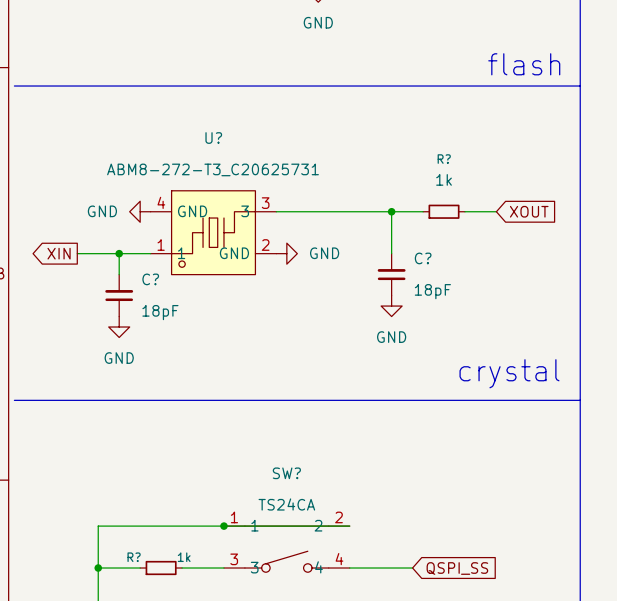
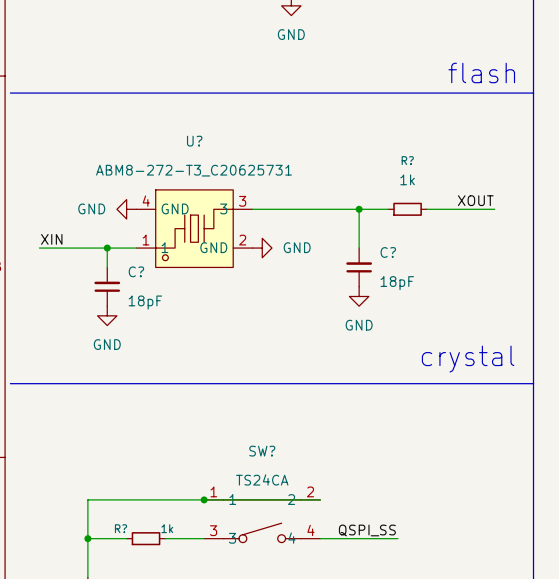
label: none -> XOUT (475, 200)
wire: none -> (456, 209) (494, 209)
global label: XOUT (529, 211) -> none
label: none -> XIN (51, 239)
wire: none -> (39, 248) (68, 248)
global label: XIN (59, 253) -> none
label: none -> QSPI_SS (367, 530)
wire: none -> (378, 538) (397, 538)
global label: QSPI_SS (457, 568) -> none

